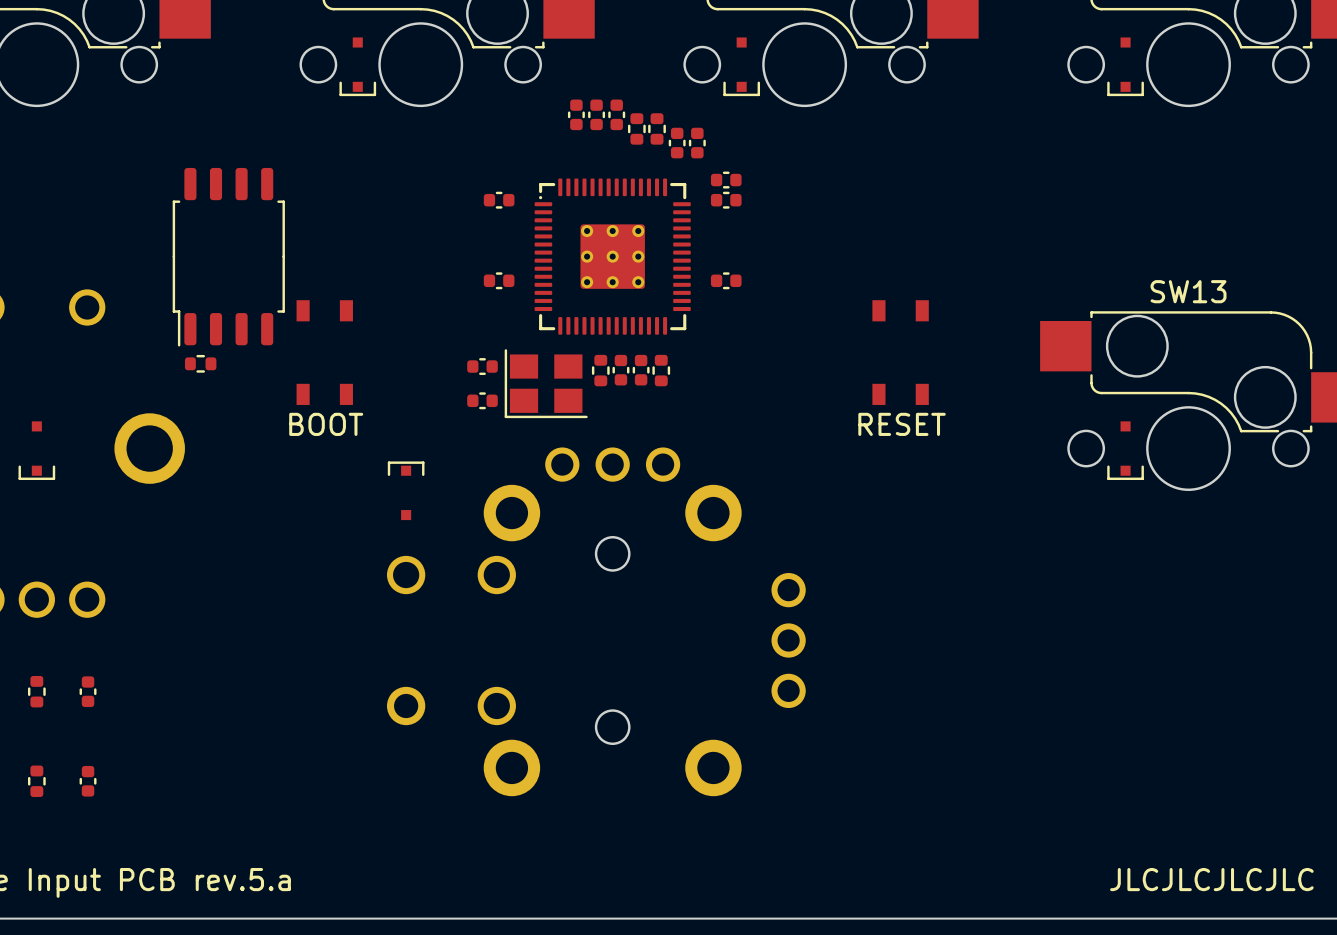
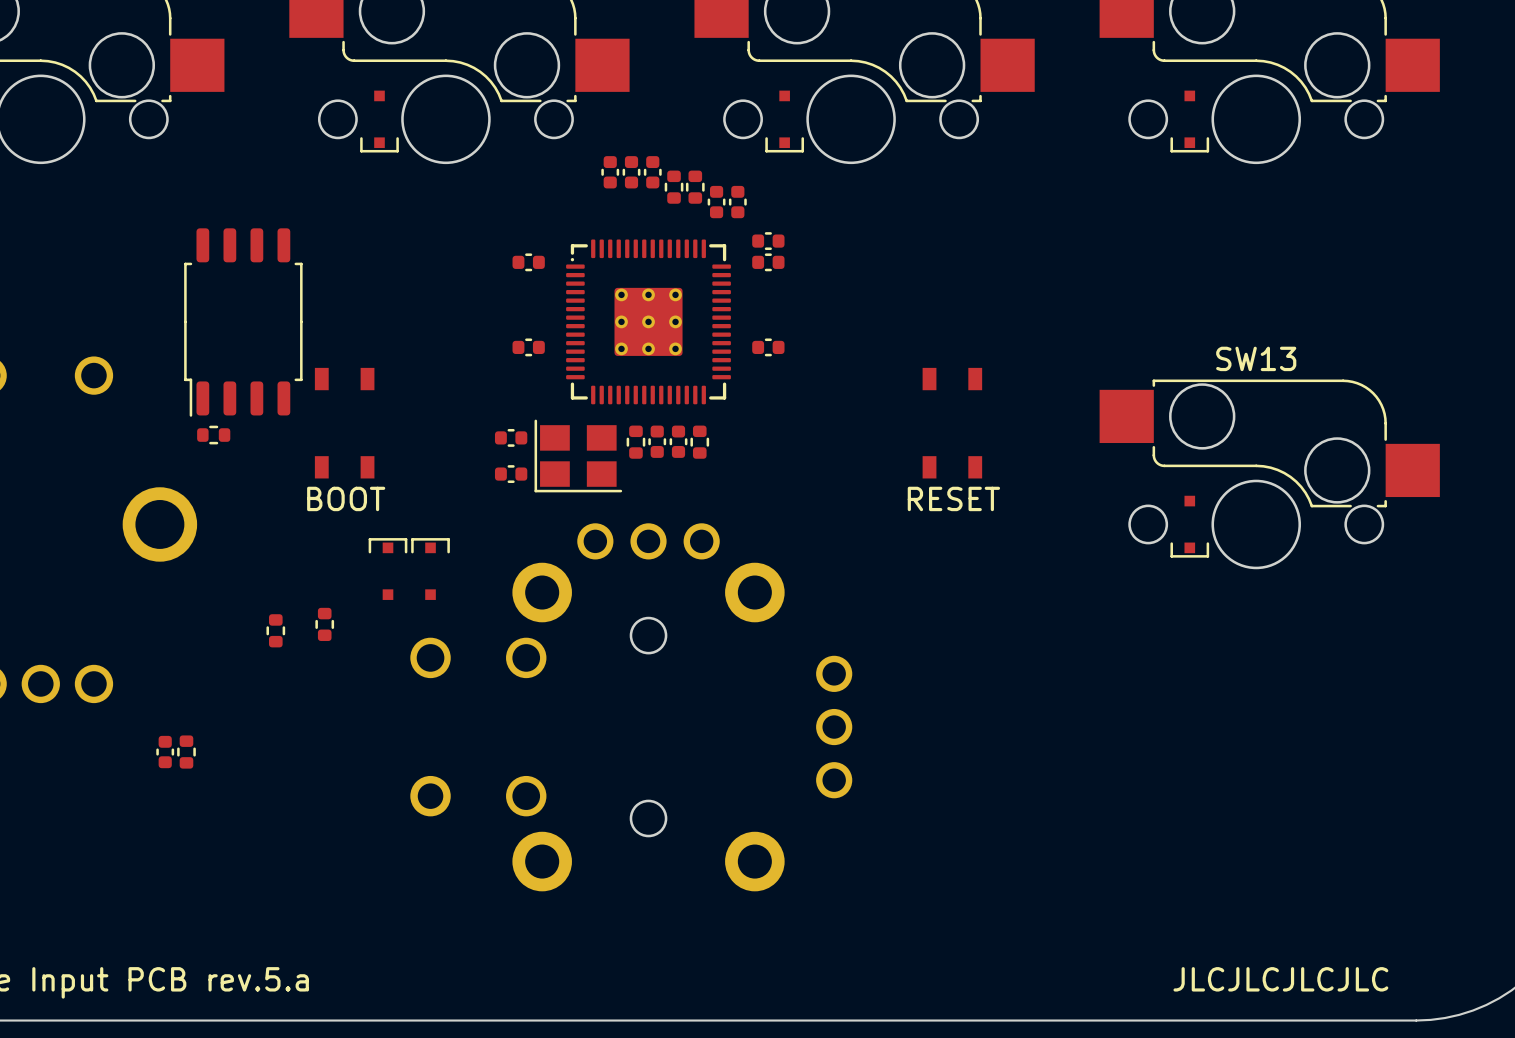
part rotation: 0° (36, 450) -> 180° (387, 569)
part position: (36, 450) -> (387, 569)
part: none -> (324, 624)
part: none -> (275, 630)
part: none -> (165, 752)
part: none -> (186, 752)
part: (36, 691) -> none
part: (88, 691) -> none
part: (36, 781) -> none
part: (88, 781) -> none

